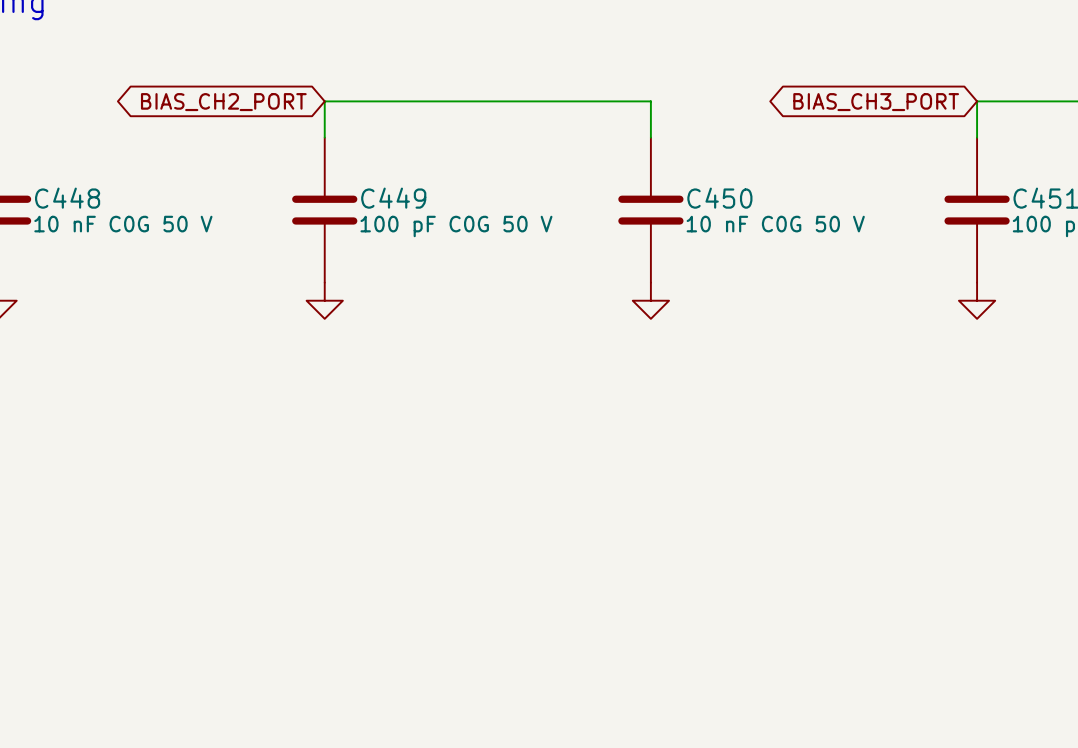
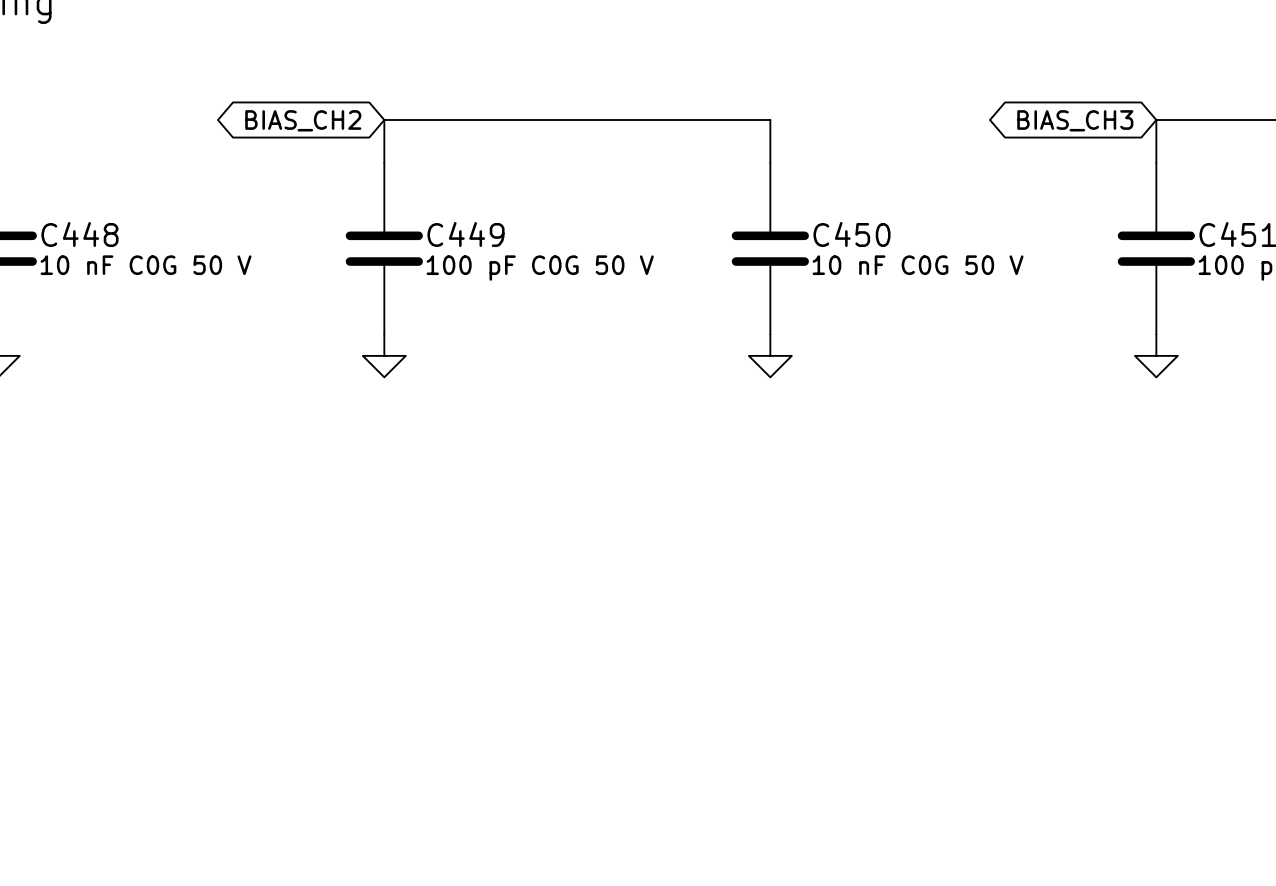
global label: BIAS_CH2_PORT (223, 102) -> BIAS_CH2 (303, 120)
global label: BIAS_CH3_PORT (876, 102) -> BIAS_CH3 (1075, 120)

